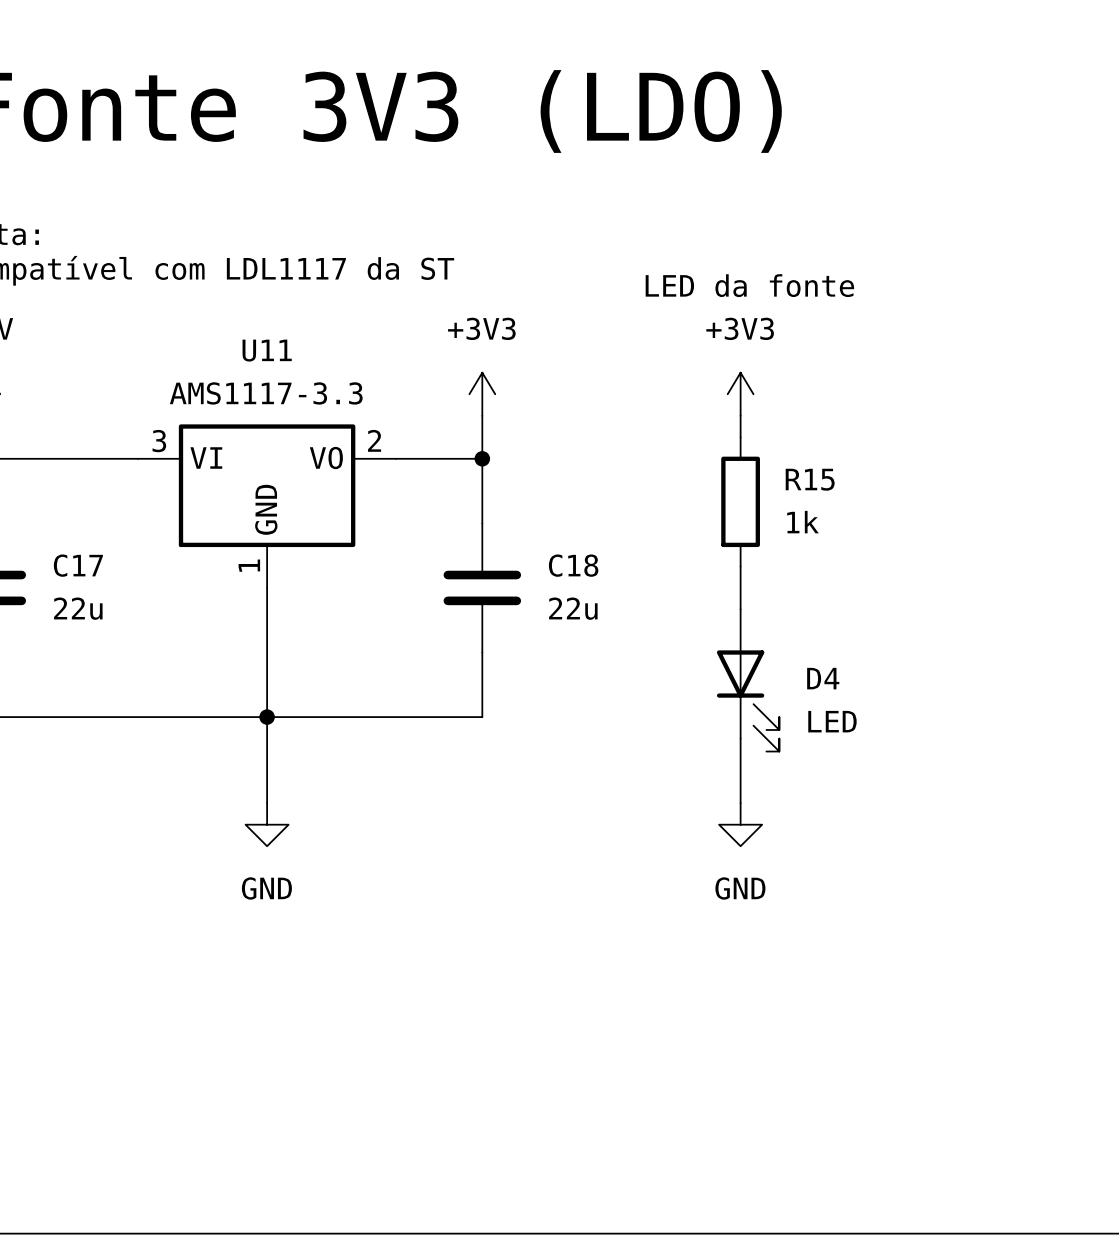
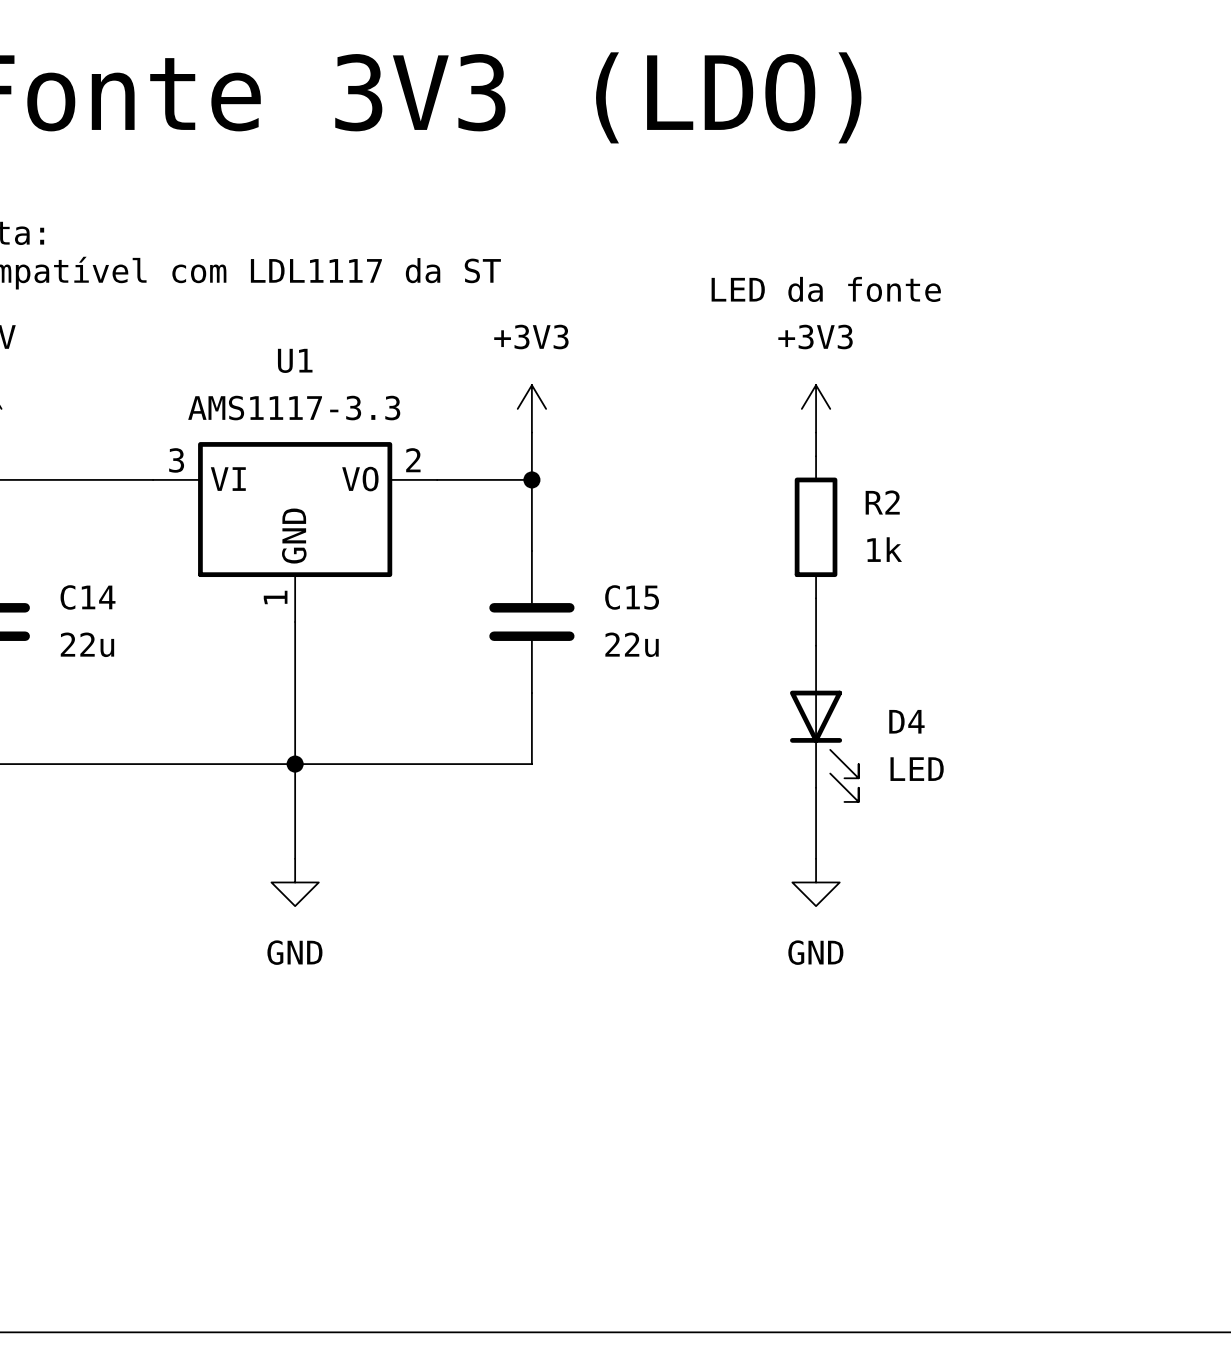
U11 name: U11 (267, 350) -> U1 (295, 360)
R15 name: R15 (810, 479) -> R2 (882, 502)
C17 name: C17 (78, 565) -> C14 (88, 597)
C18 name: C18 (573, 565) -> C15 (632, 597)

